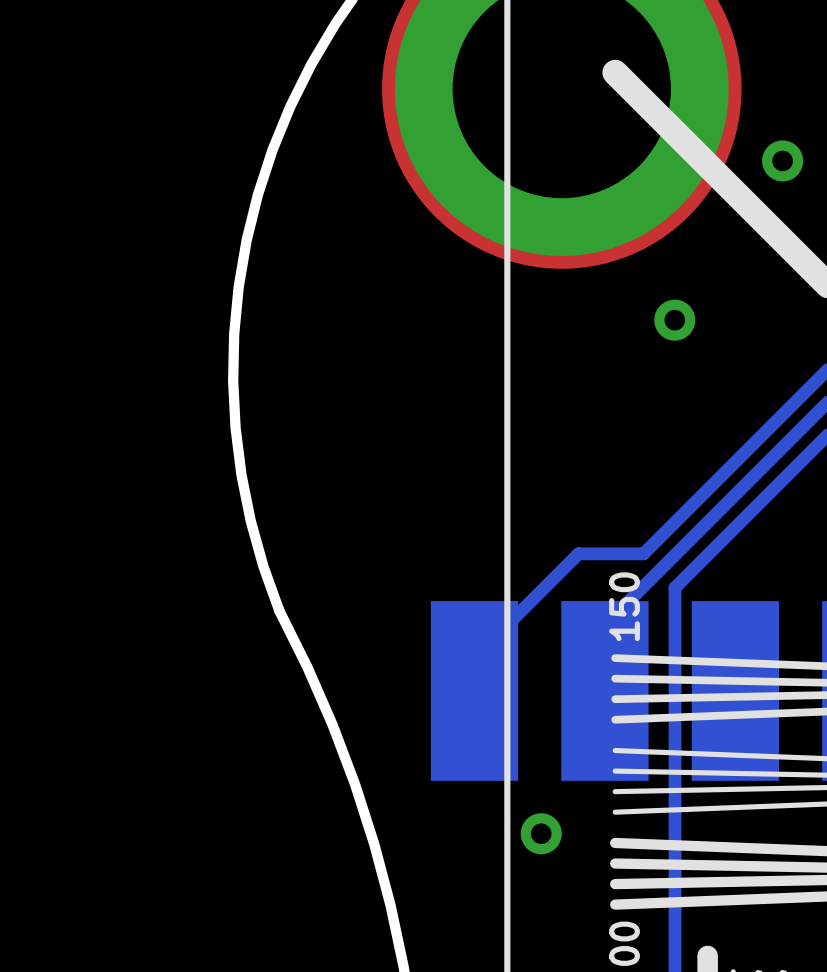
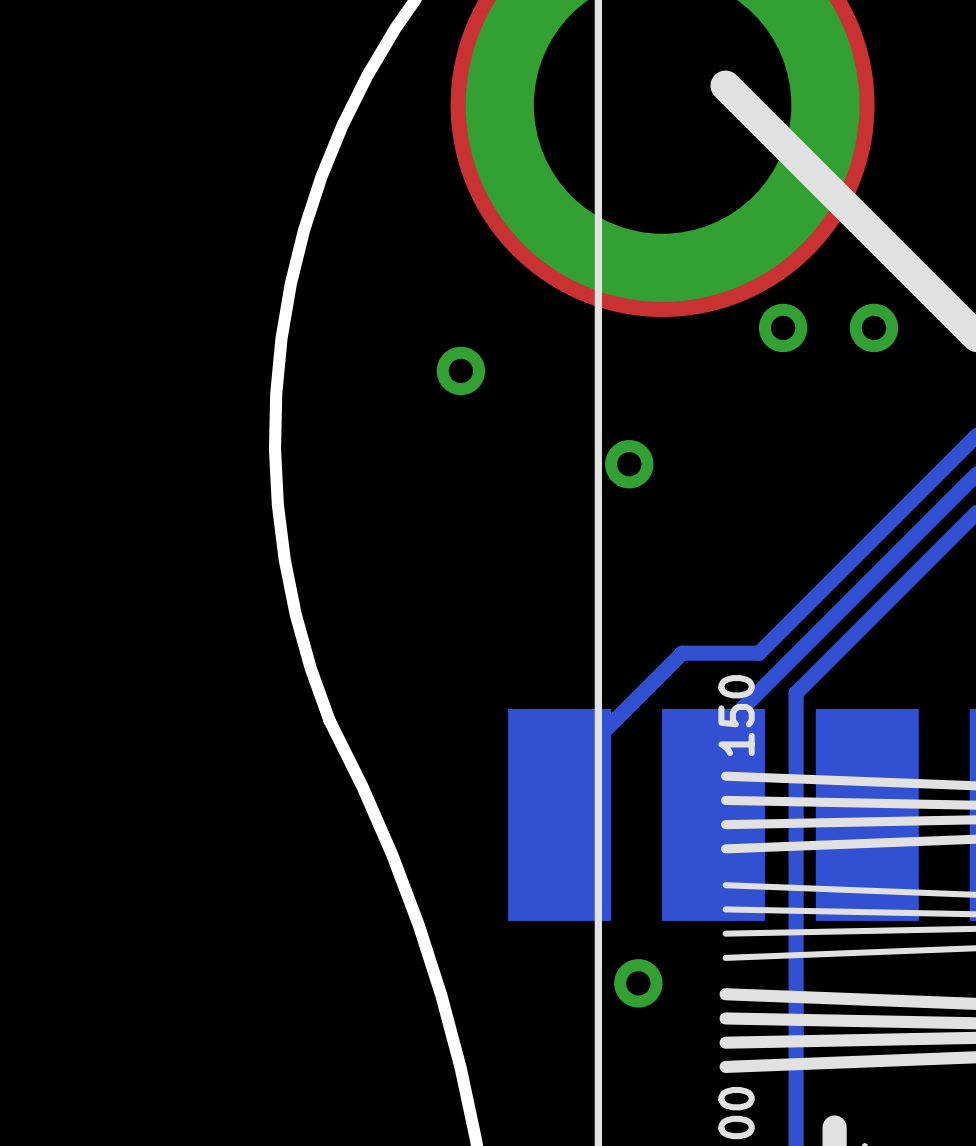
via: (782, 160) -> none
via: none -> (783, 327)
via: none -> (873, 327)
via: none -> (460, 370)
via: (674, 320) -> none
via: none -> (629, 464)

